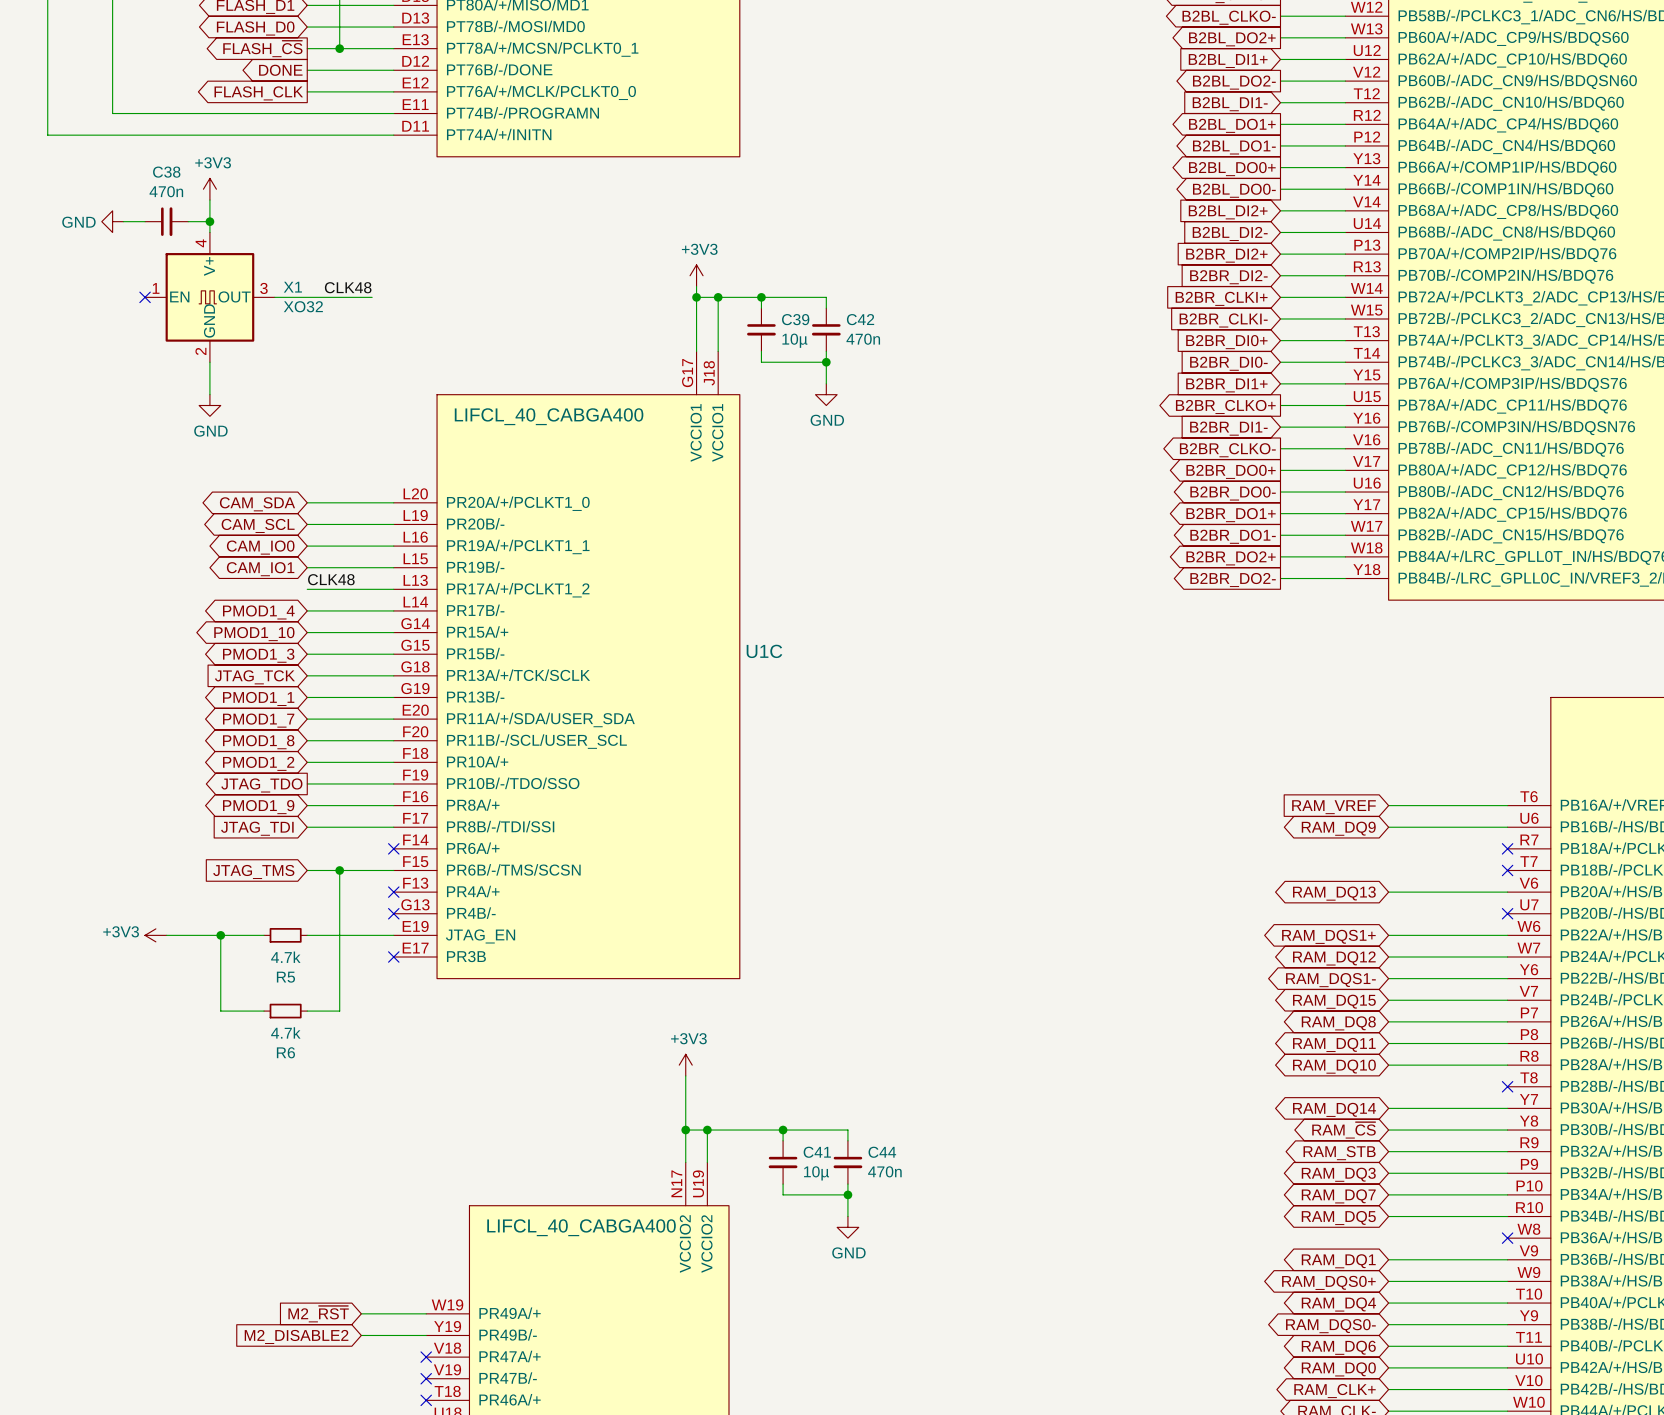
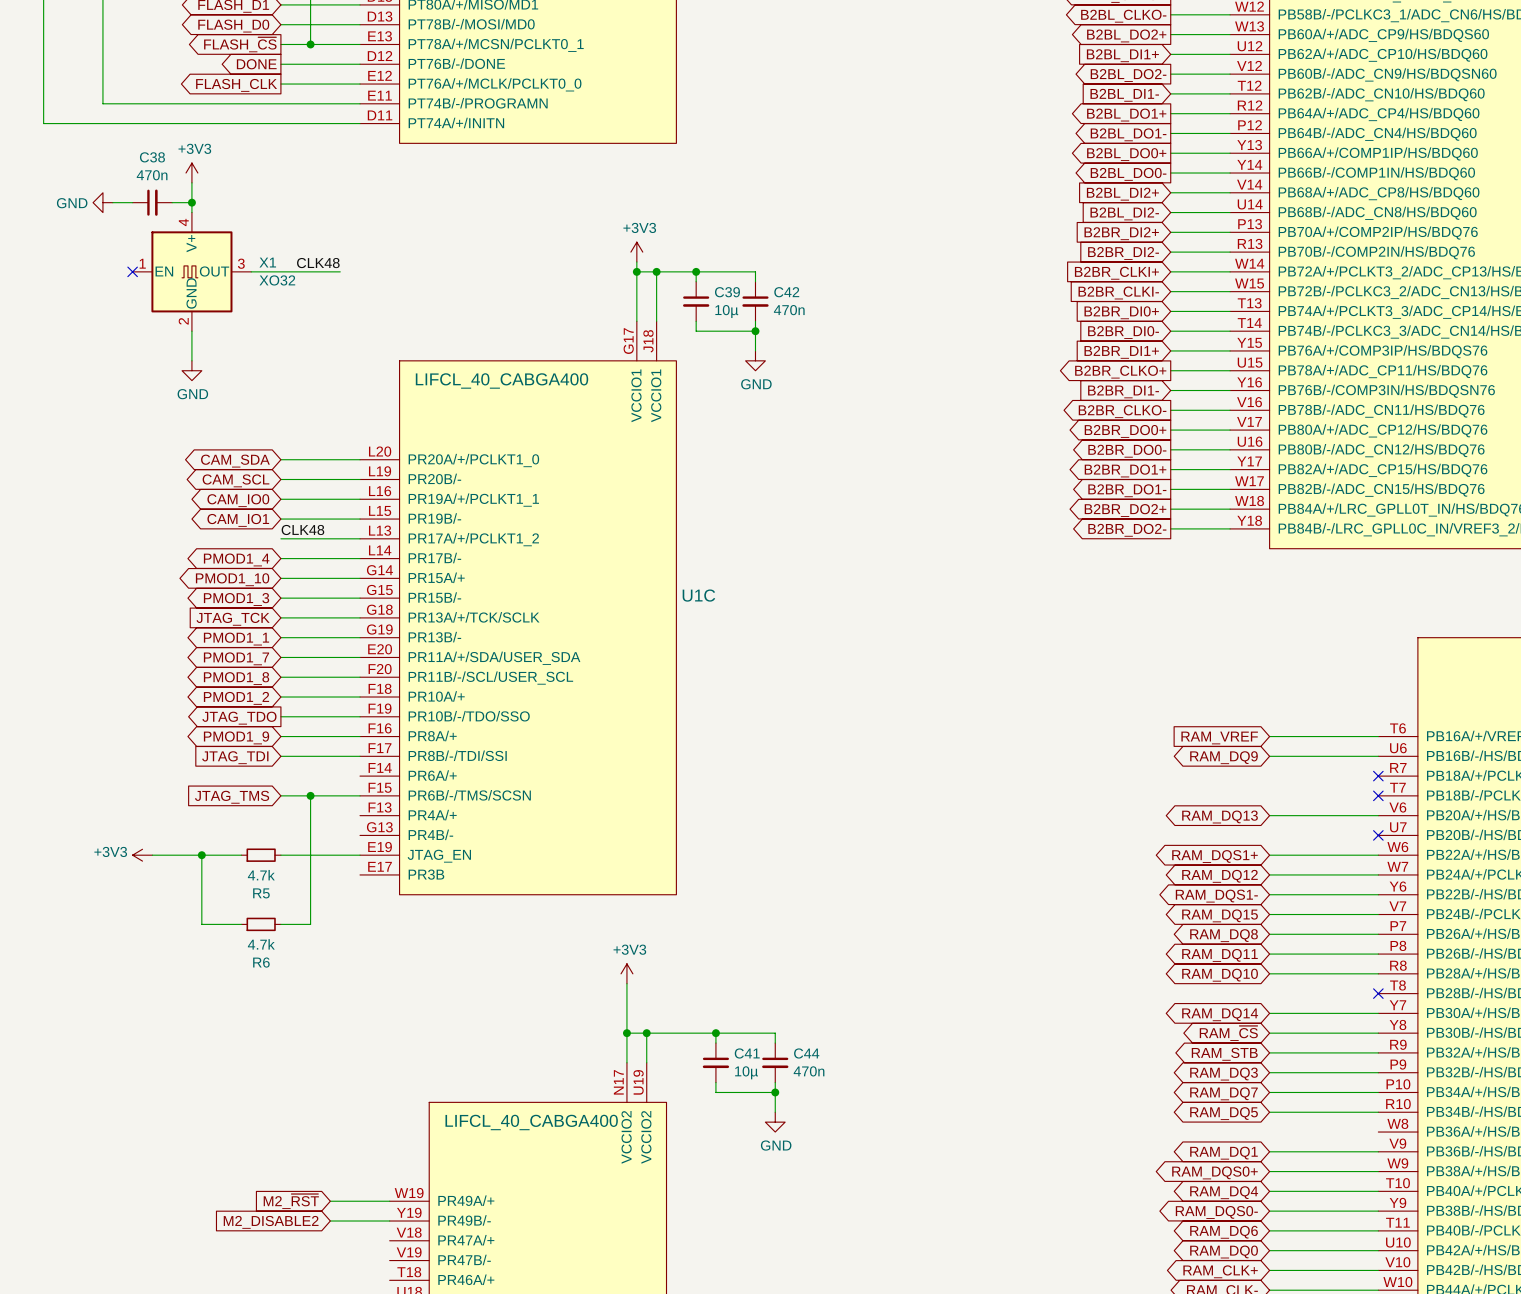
no-connect mark: (393, 848) -> none
no-connect mark: (393, 892) -> none
no-connect mark: (393, 913) -> none
no-connect mark: (393, 957) -> none
no-connect mark: (1507, 1238) -> none
no-connect mark: (426, 1357) -> none
no-connect mark: (426, 1378) -> none
no-connect mark: (426, 1400) -> none

